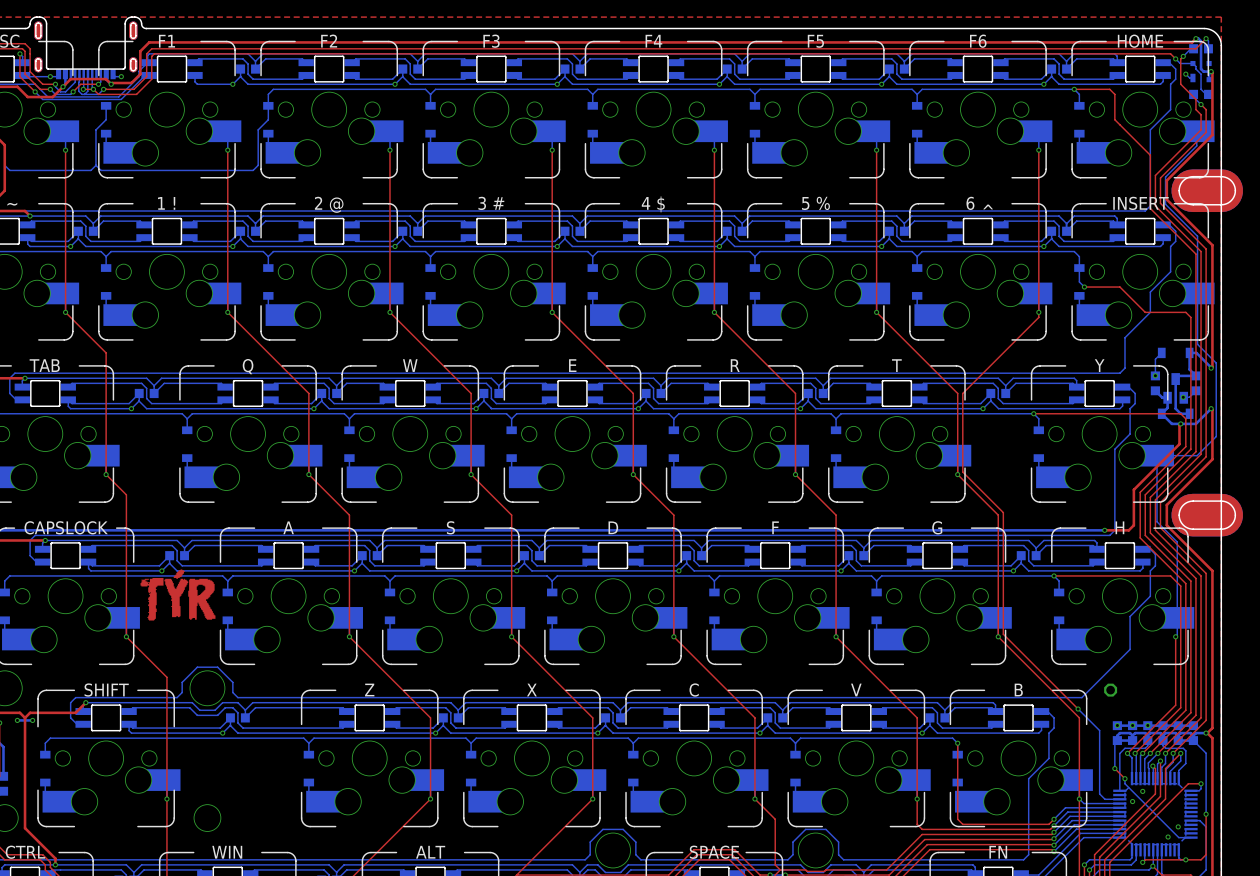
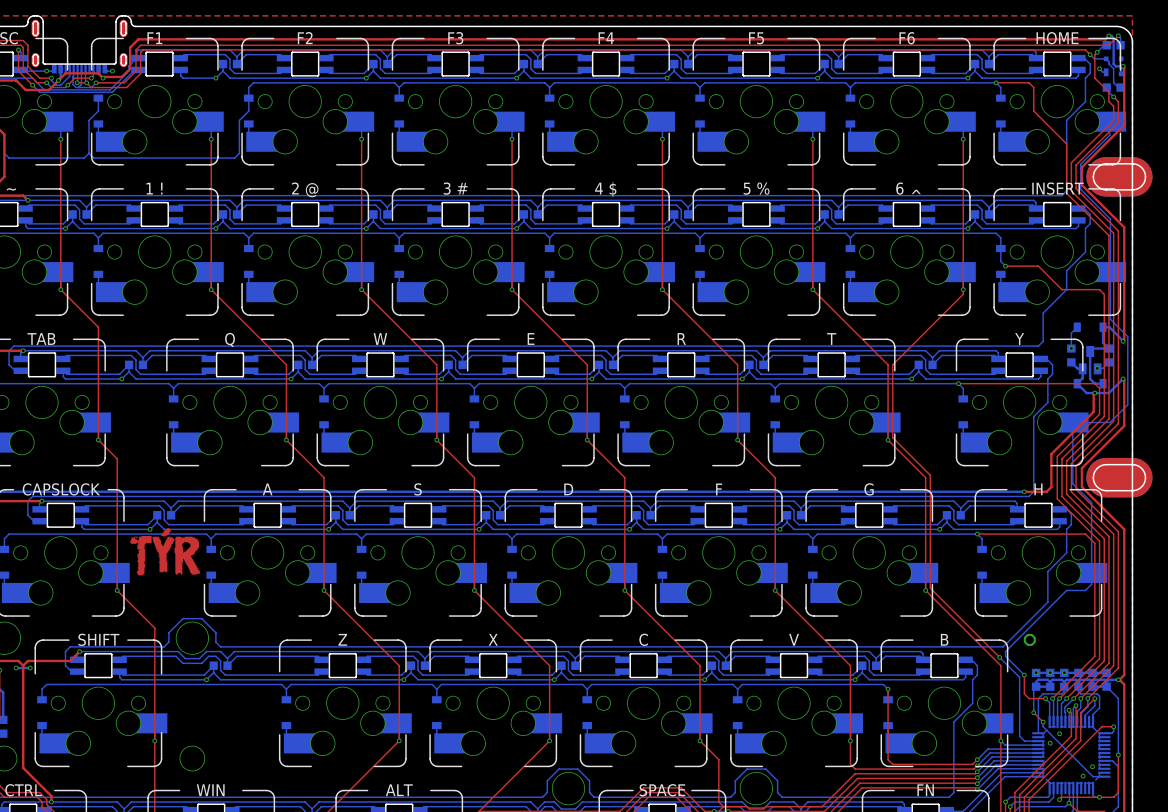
bottom track: (1177, 630) (1175, 636) -> (1091, 584) (1085, 590) (1066, 590) (1005, 651) (1005, 656) (1024, 675)
top track: (1175, 636) (1175, 705) (1127, 753) -> (1024, 675) (1024, 693) (1029, 698) (1045, 698)
via: (1175, 636) -> none
via: none -> (1024, 675)

